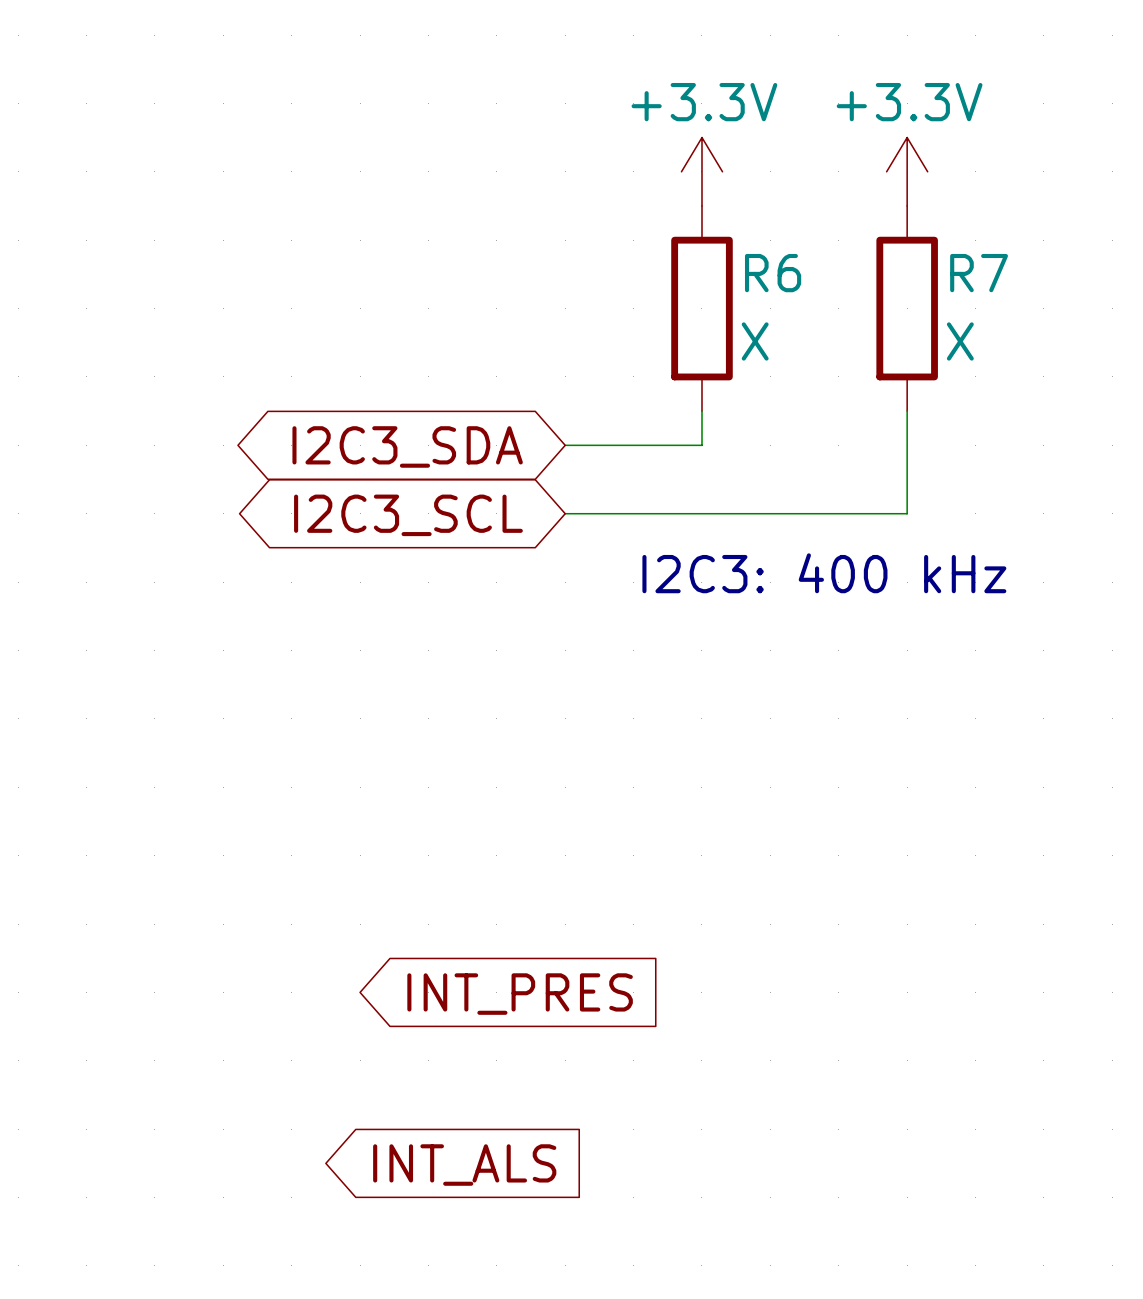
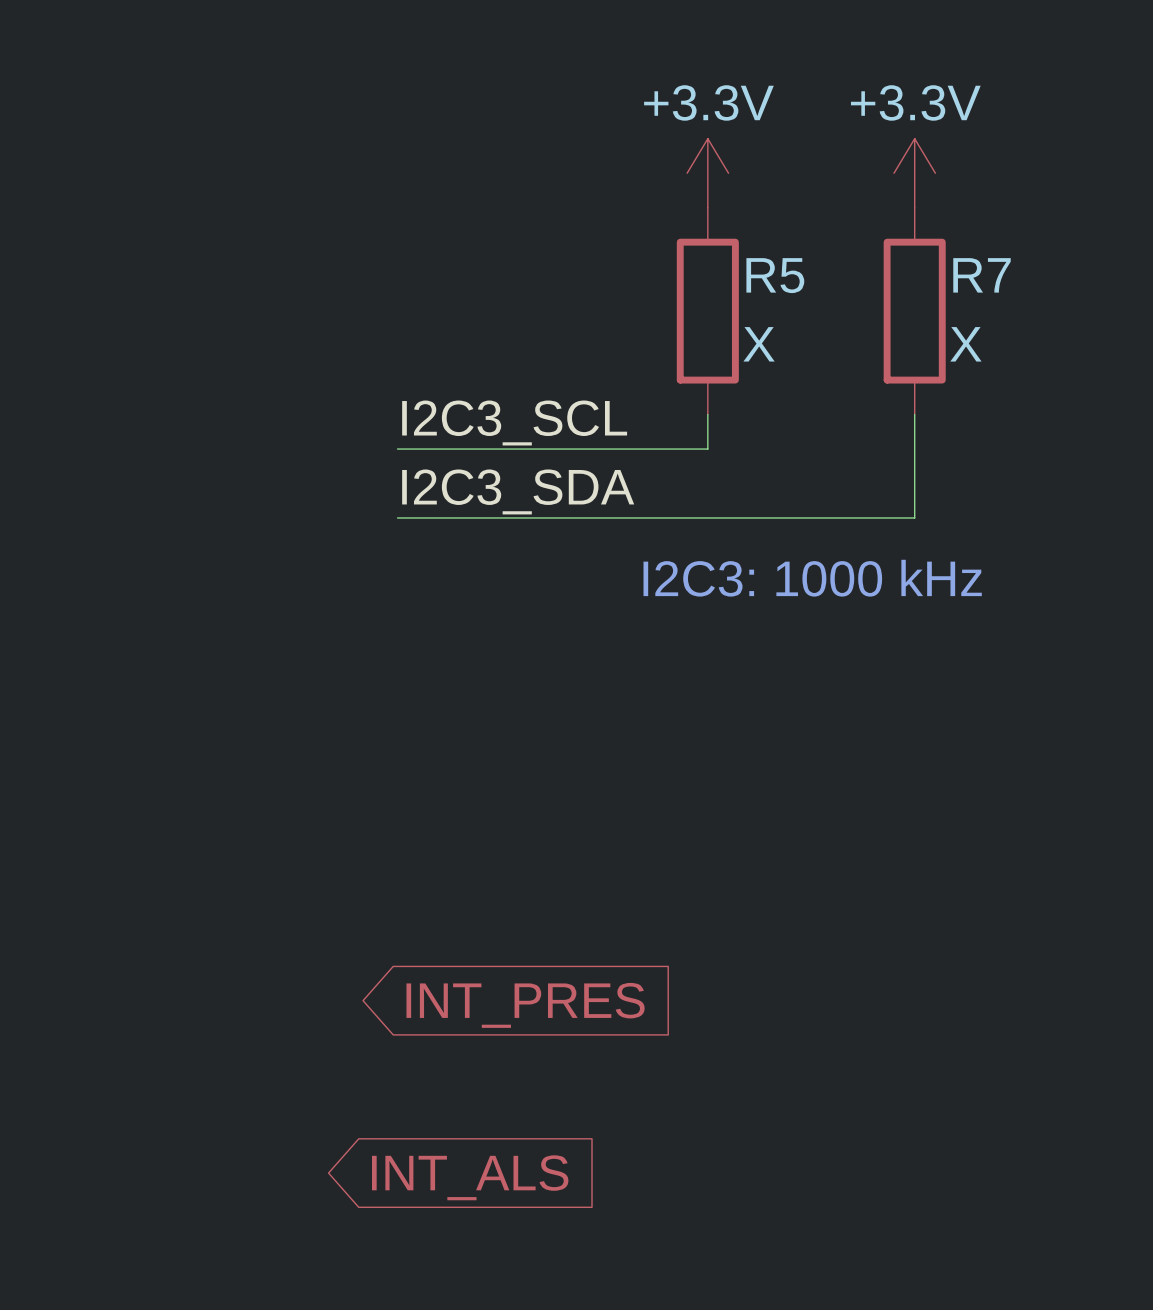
R6 name: R6 (773, 273) -> R5 (775, 275)
label: none -> I2C3_SCL (514, 422)
wire: none -> (397, 449) (569, 449)
global label: I2C3_SDA (407, 446) -> none
label: none -> I2C3_SDA (518, 491)
wire: none -> (397, 517) (569, 517)
global label: I2C3_SCL (408, 515) -> none
text: I2C3: 400 kHz (824, 573) -> I2C3: 1000 kHz (812, 578)

